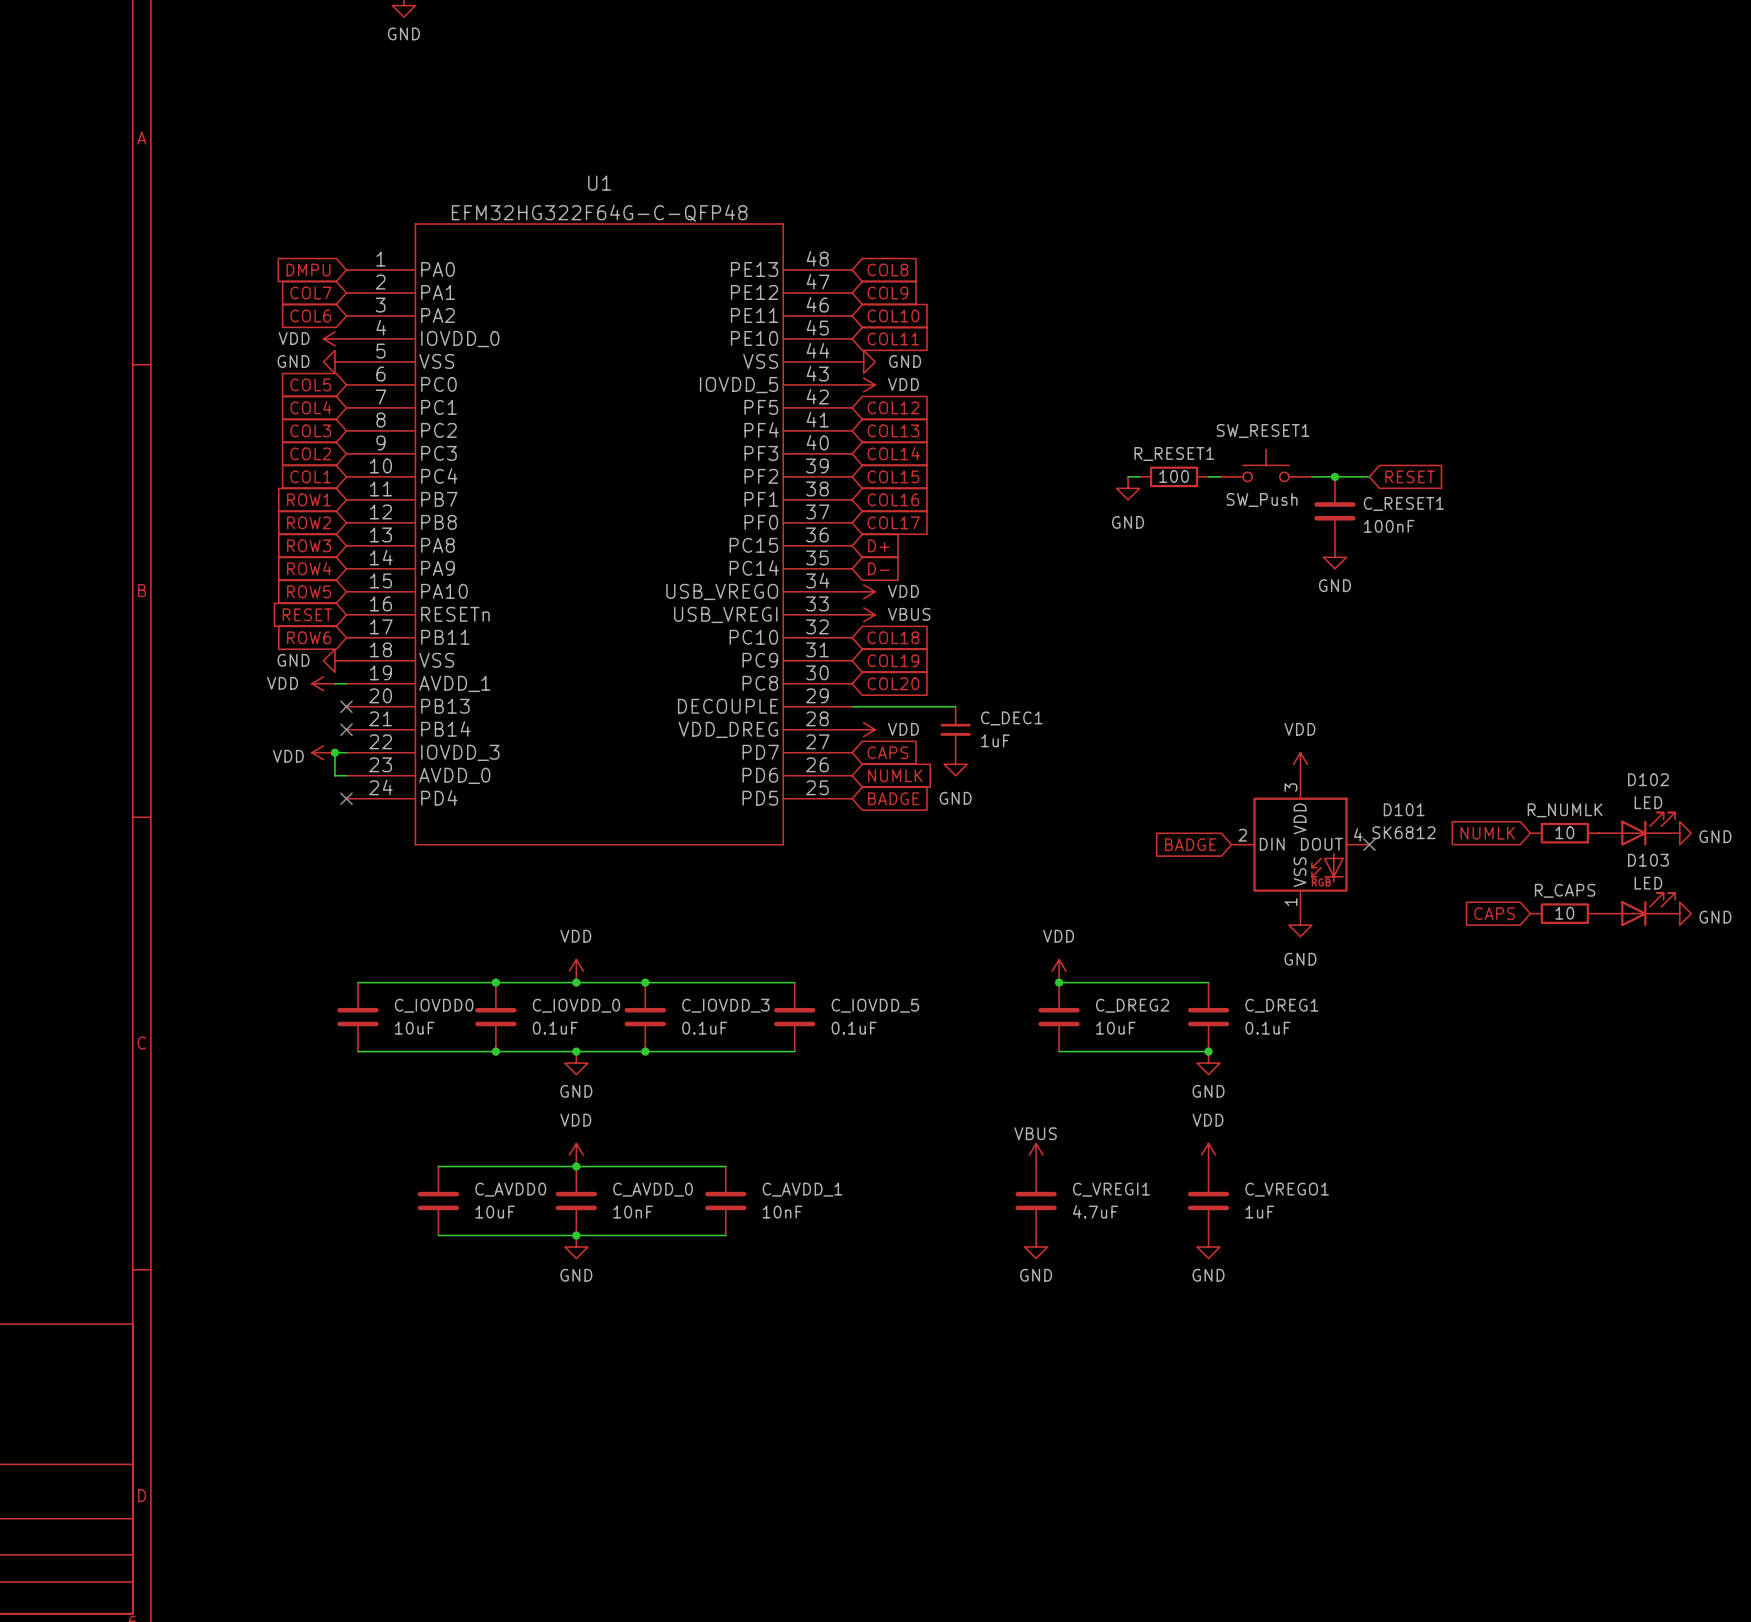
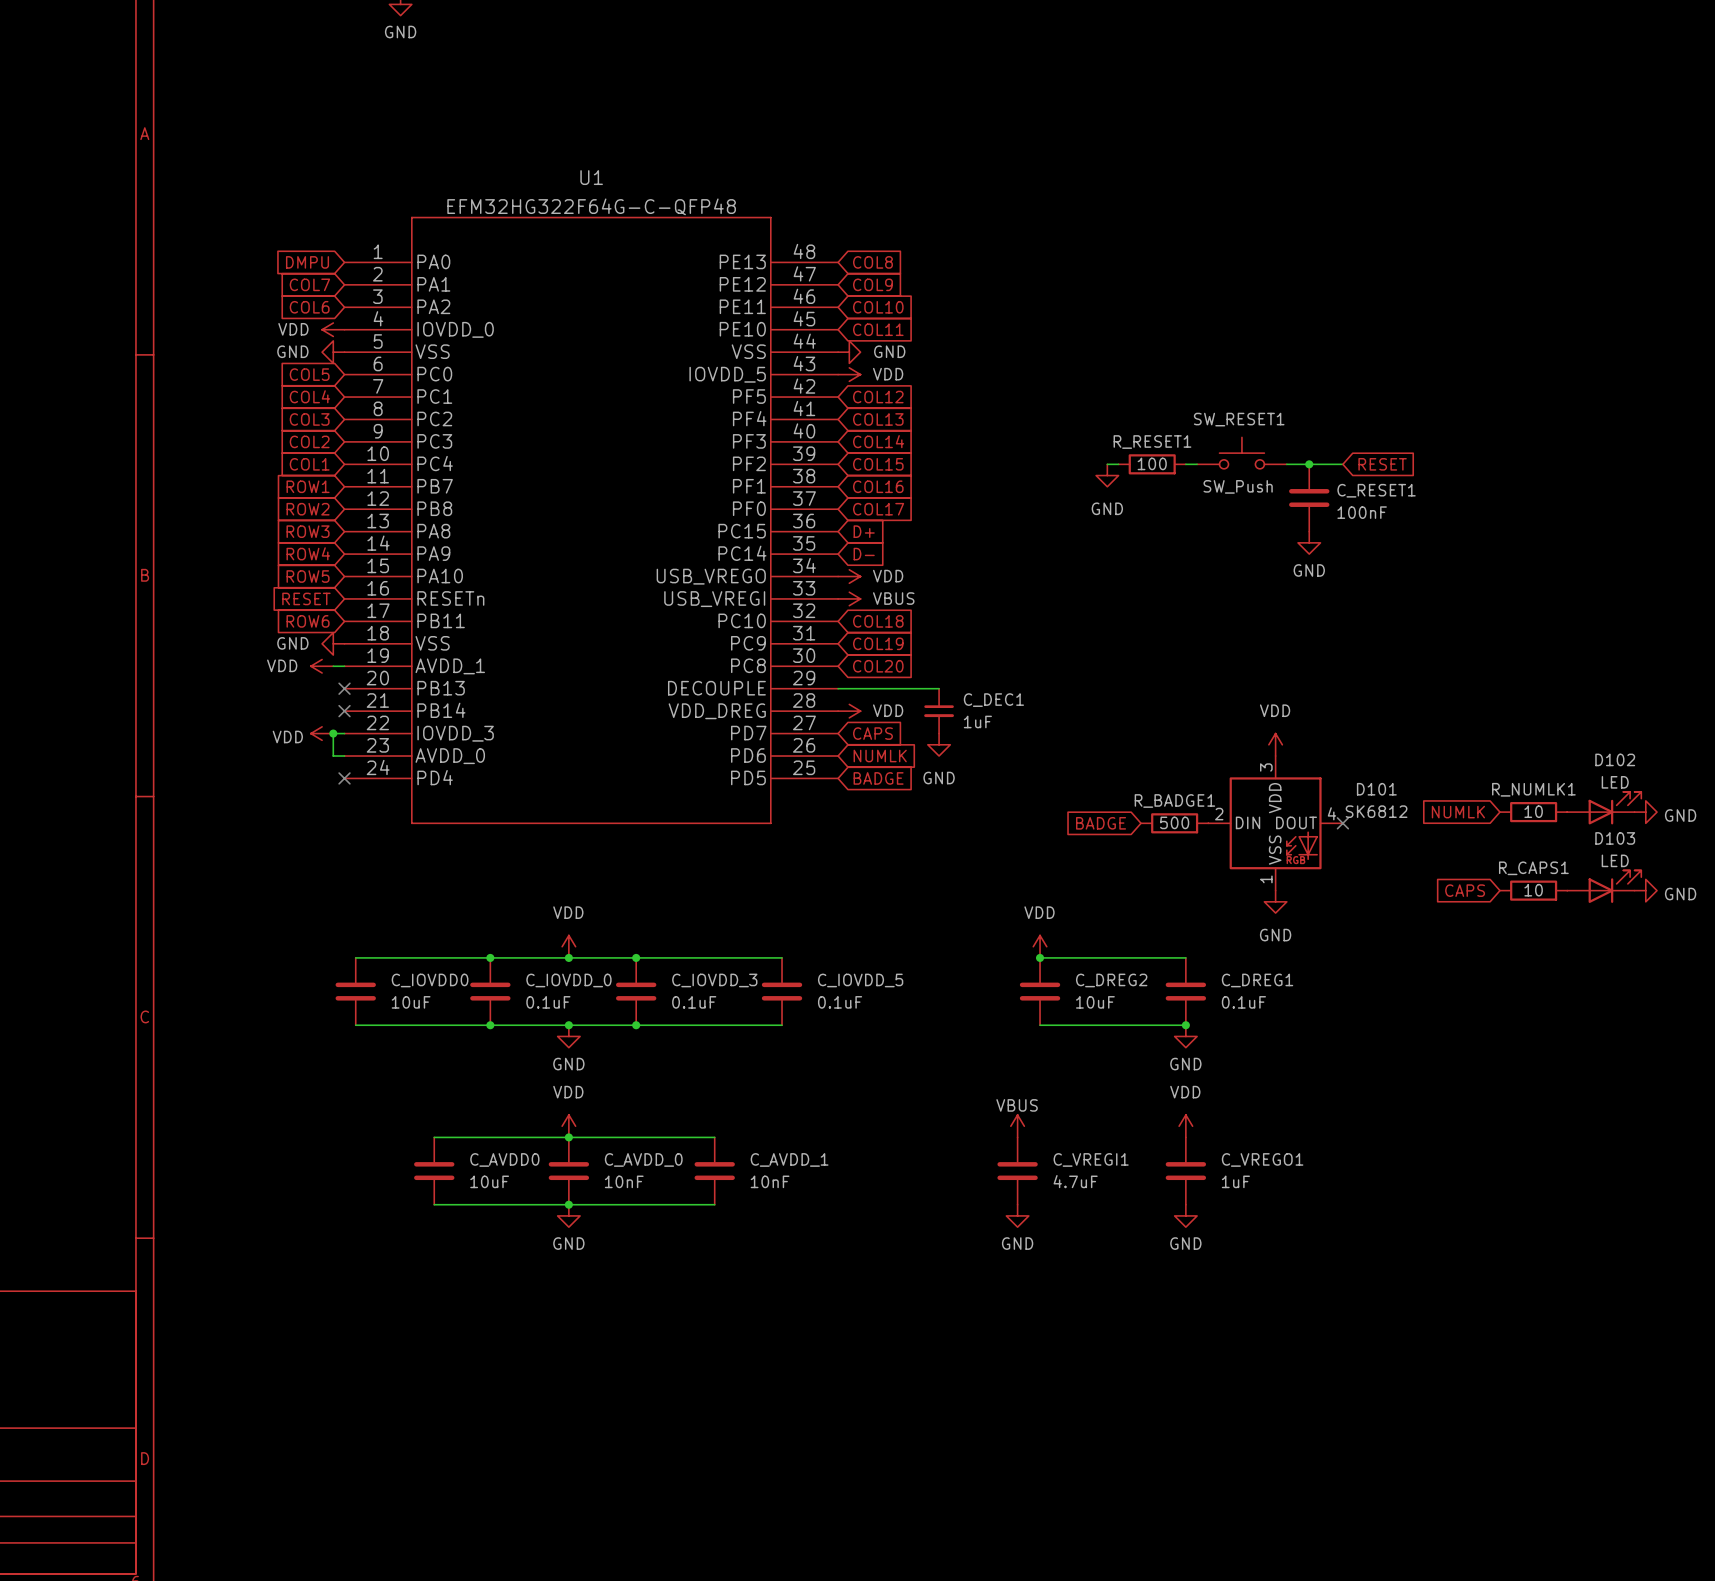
R_NUMLK name: R_NUMLK (1565, 810) -> R_NUMLK1 (1533, 789)
global label position: BADGE (1190, 844) -> BADGE (1101, 823)
R_BADGE1: none -> 500 (1174, 823)
R_CAPS name: R_CAPS (1565, 890) -> R_CAPS1 (1533, 868)

